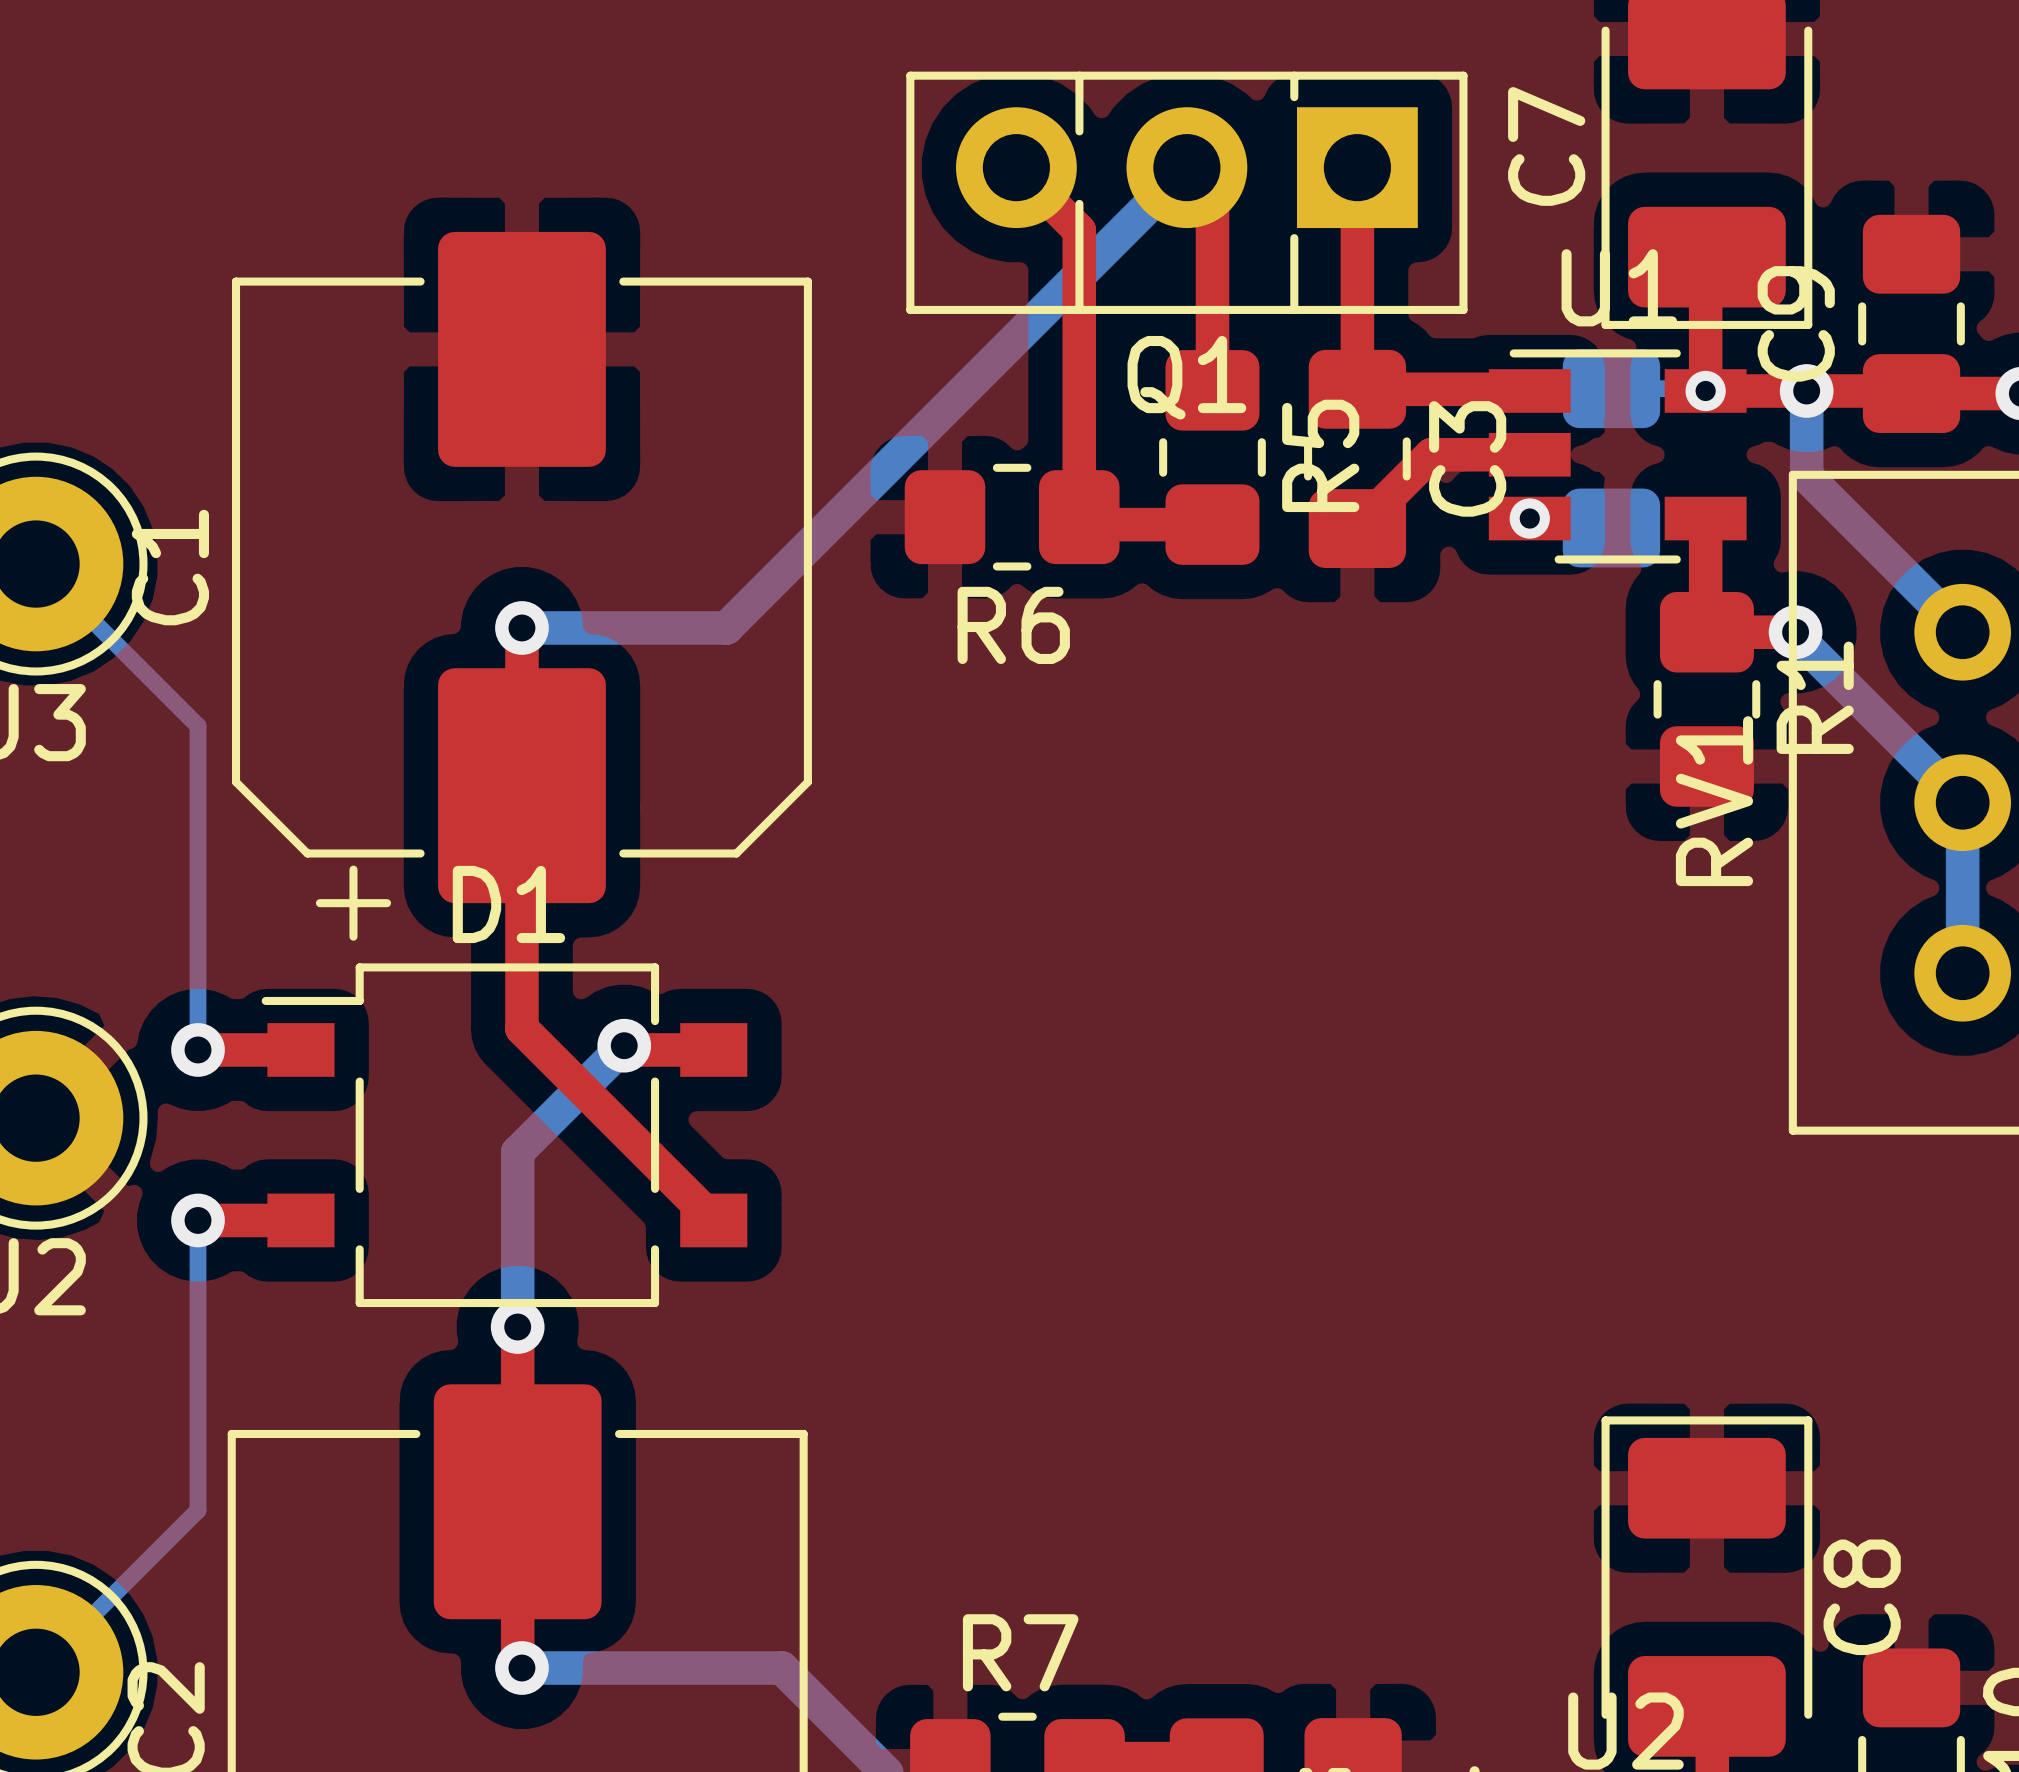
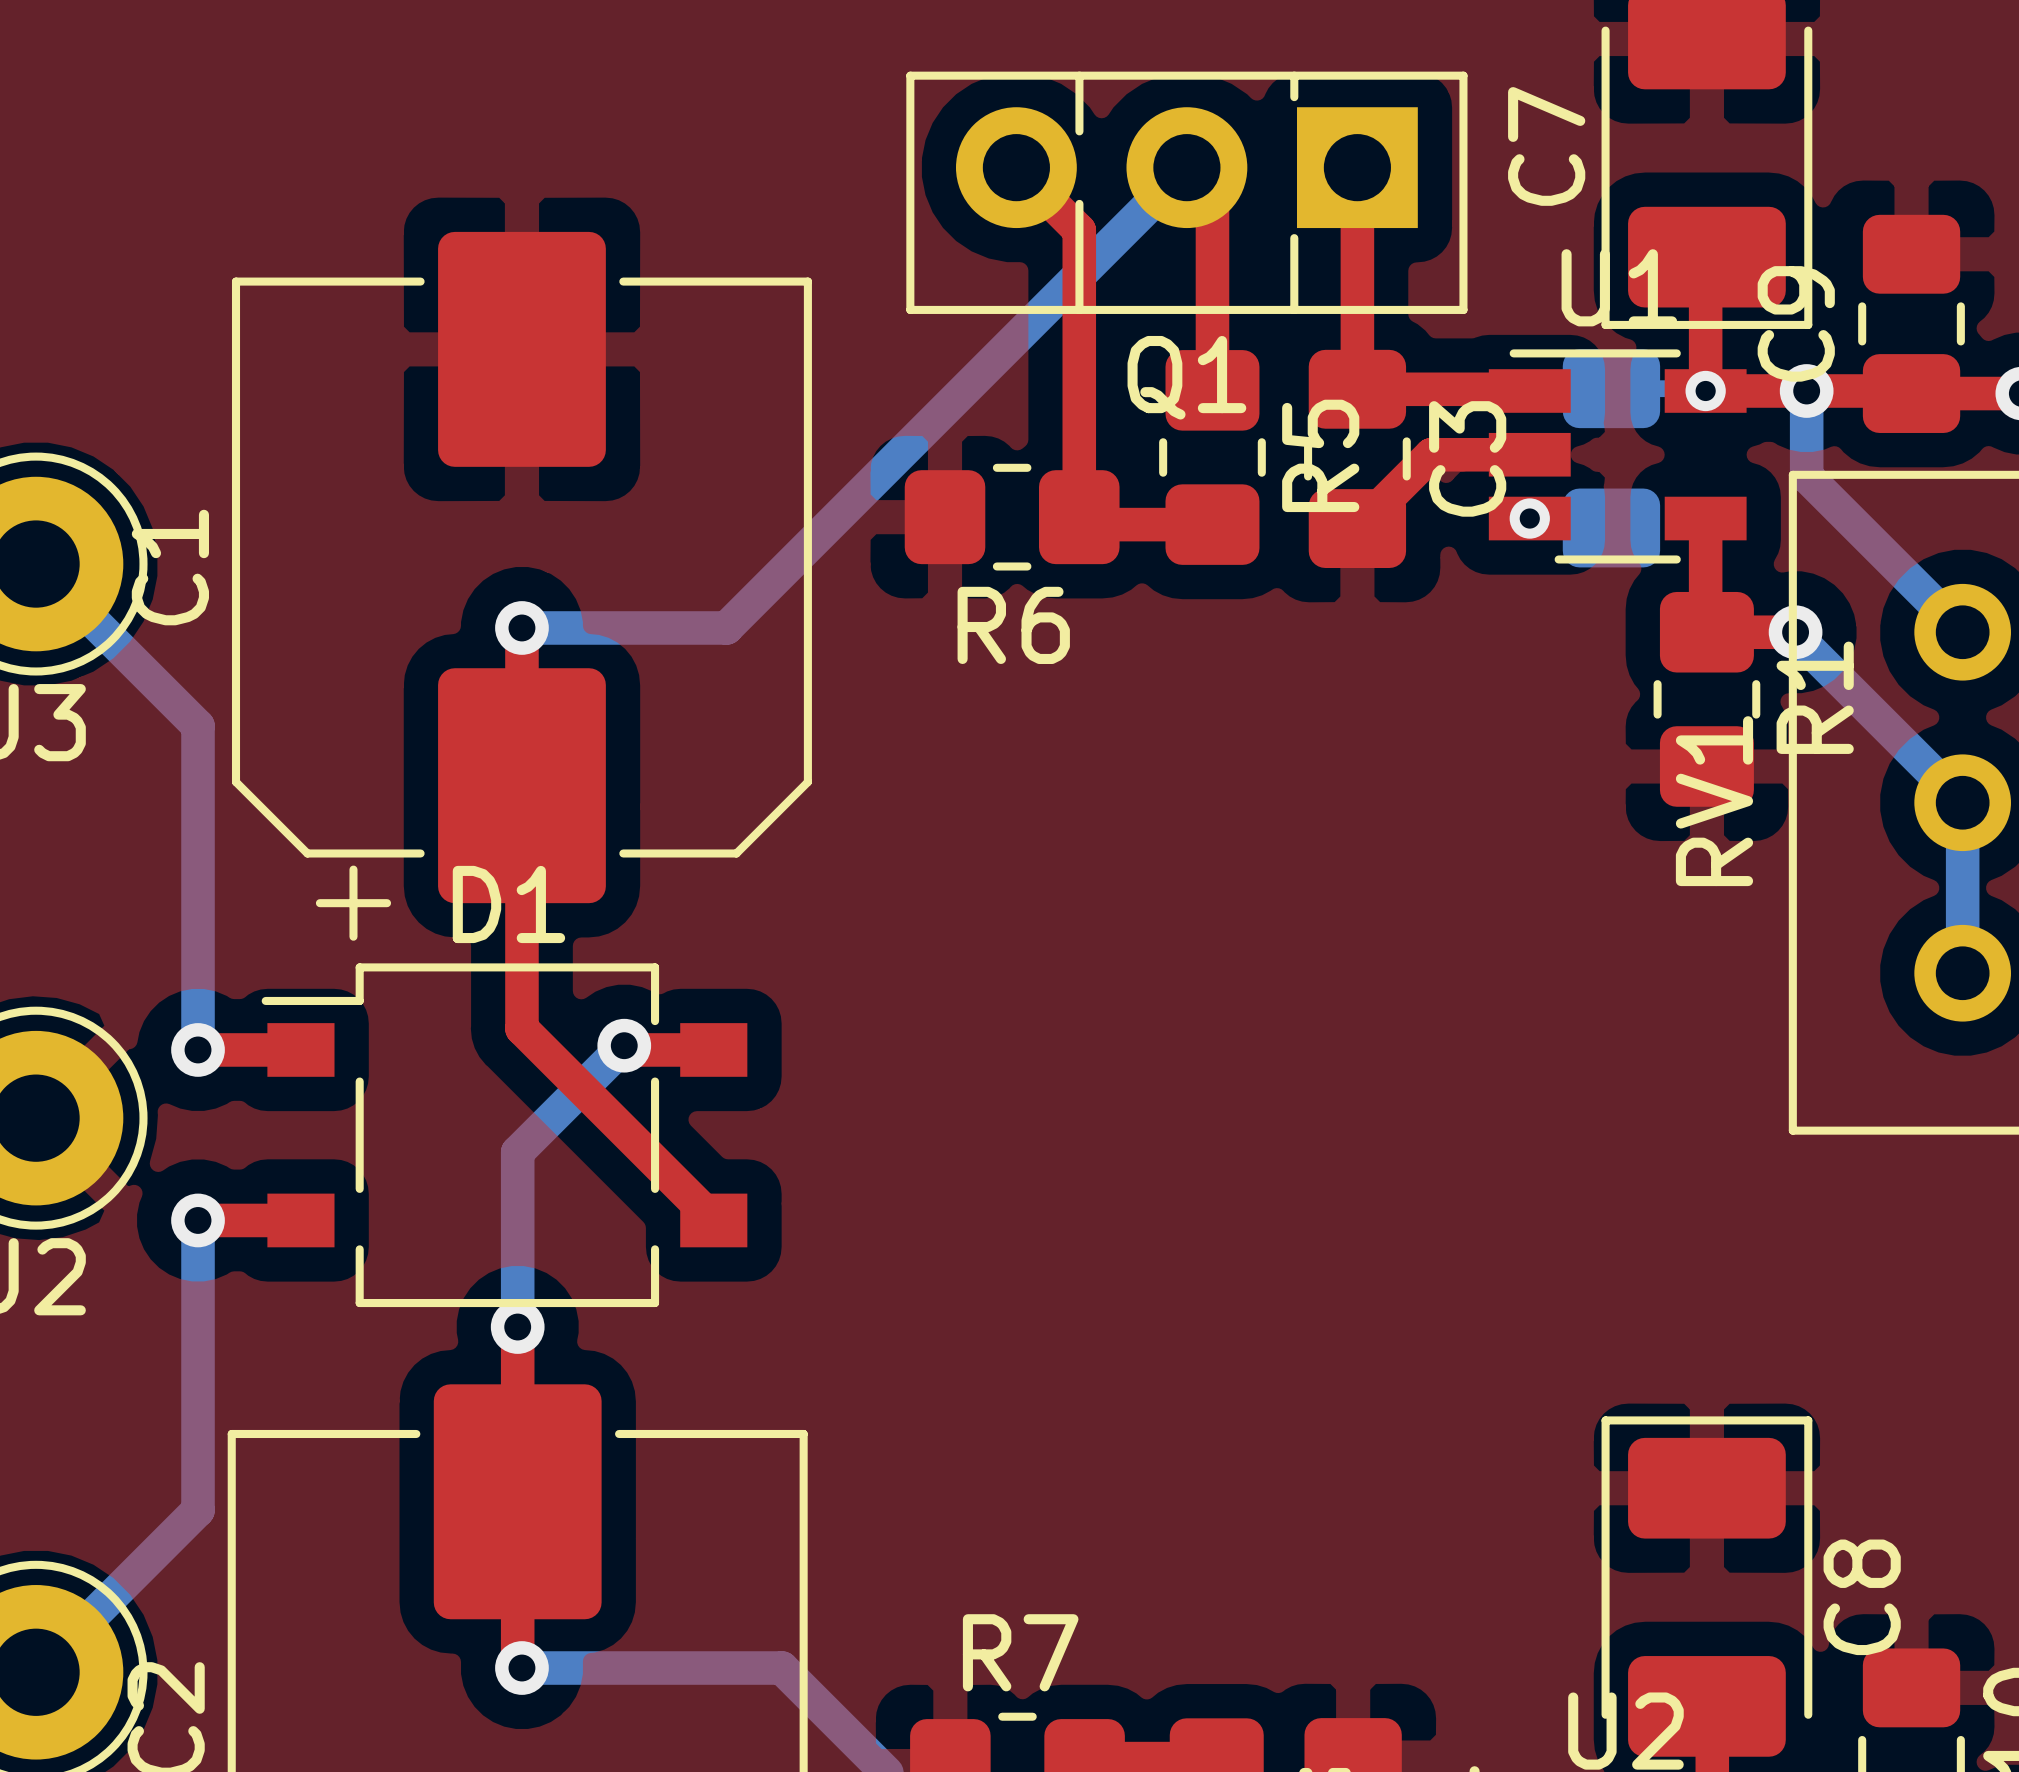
bottom track width: thin (36, 564) (198, 726) (198, 1049) -> thick (36, 564) (198, 726) (198, 1049)
bottom track width: thin (198, 1220) (198, 1510) (36, 1672) -> thick (198, 1220) (198, 1510) (36, 1672)

